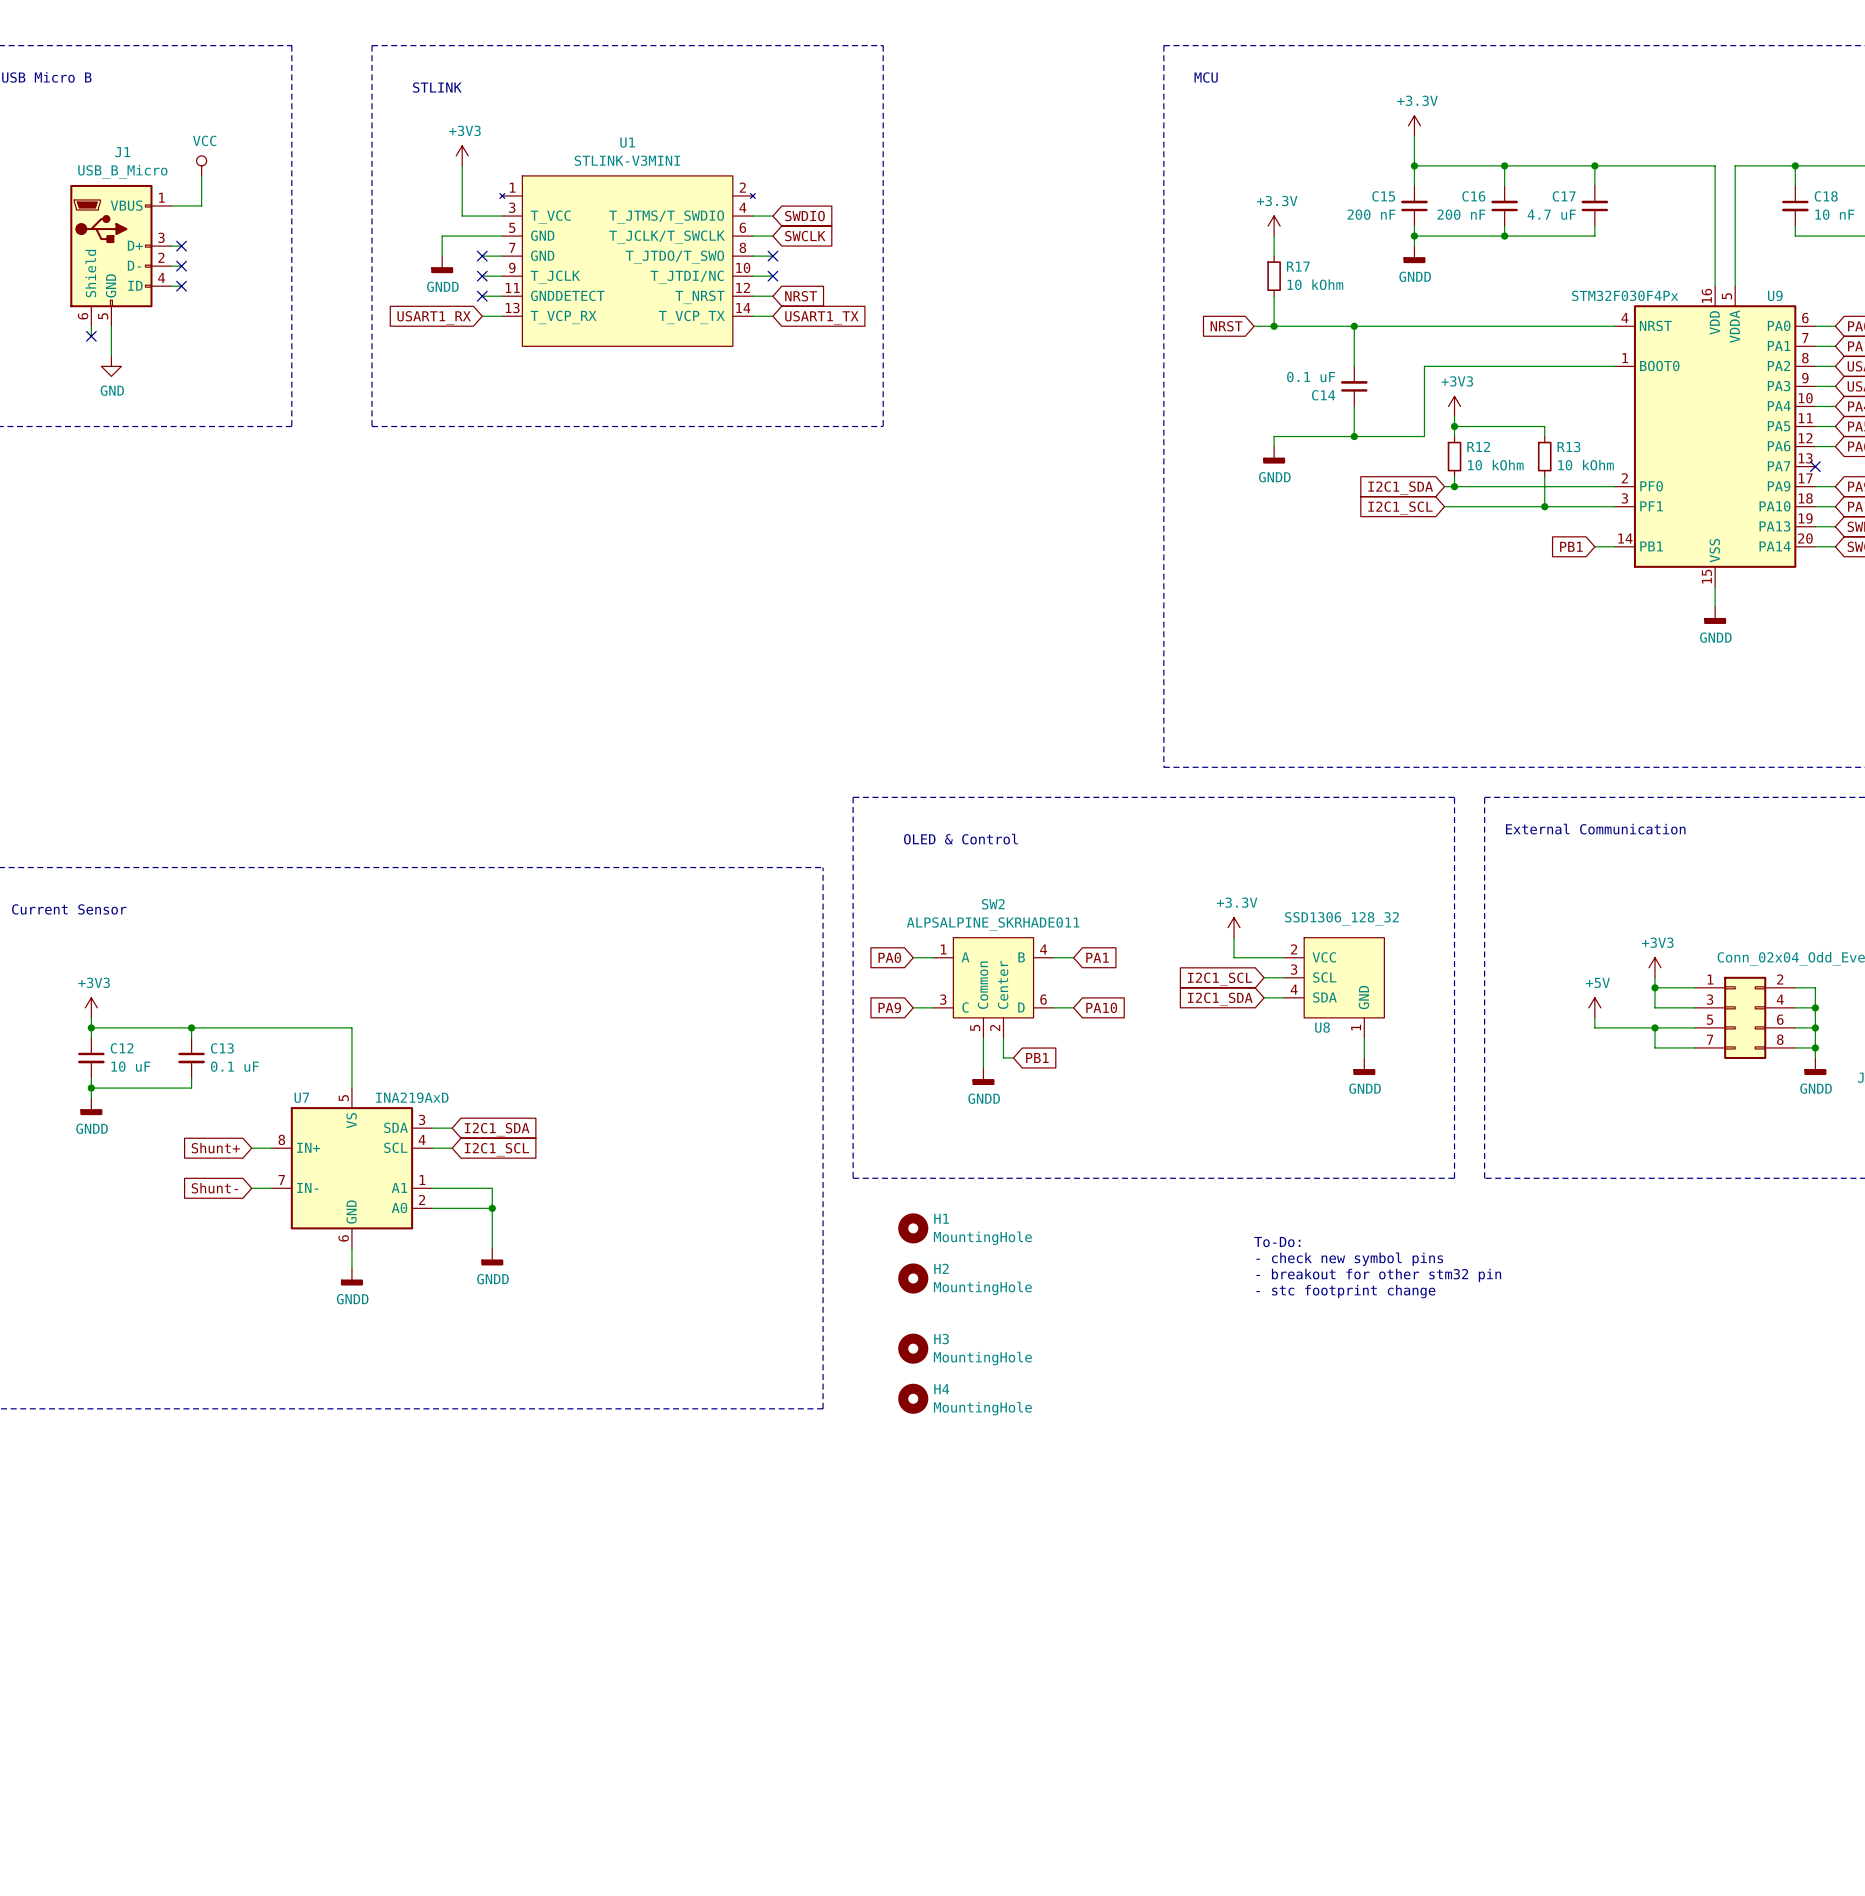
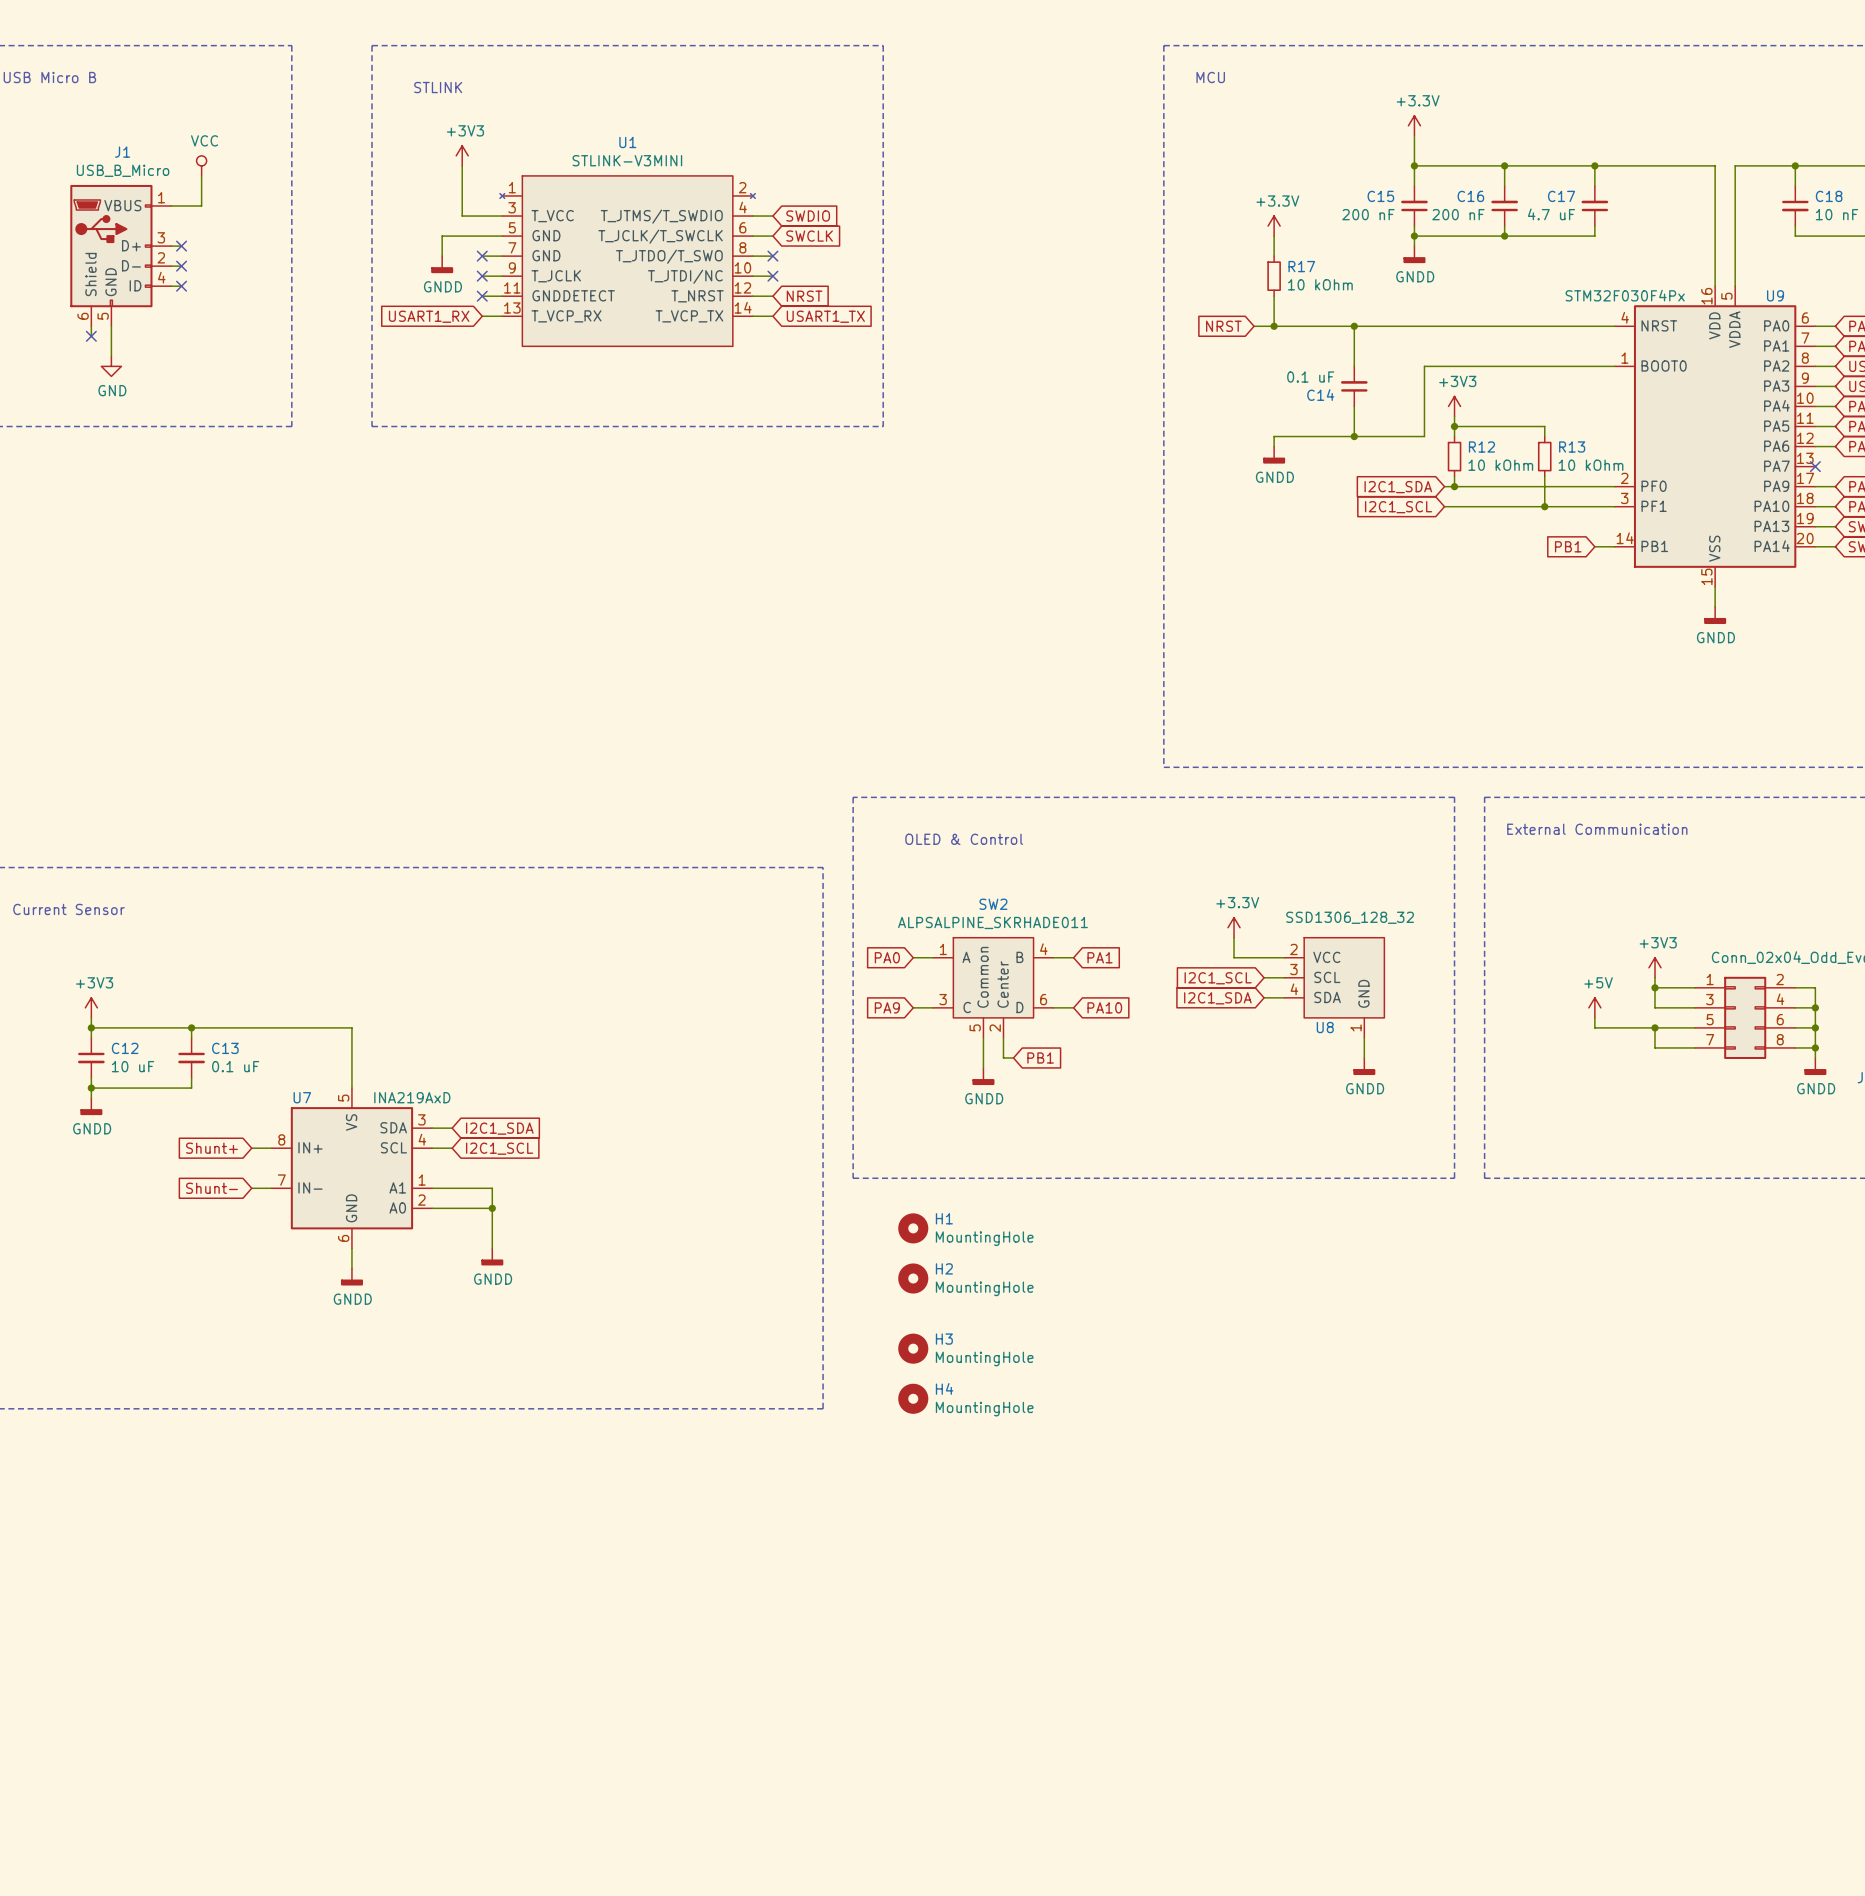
text: To-Do: (1277, 1242) -> none
text: - check new symbol pins (1349, 1259) -> none
text: - breakout for other stm32 pin (1378, 1275) -> none
text: - stc footprint change (1345, 1291) -> none

